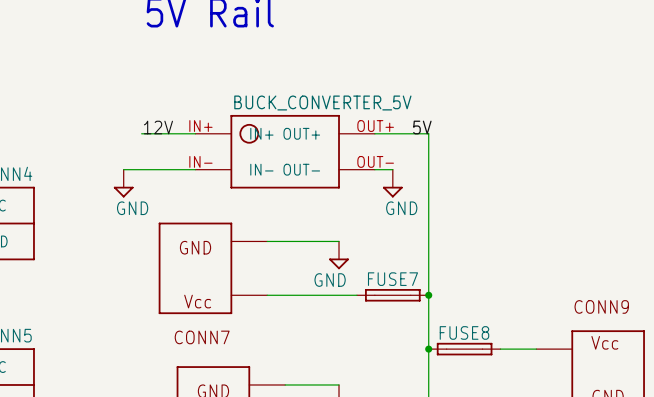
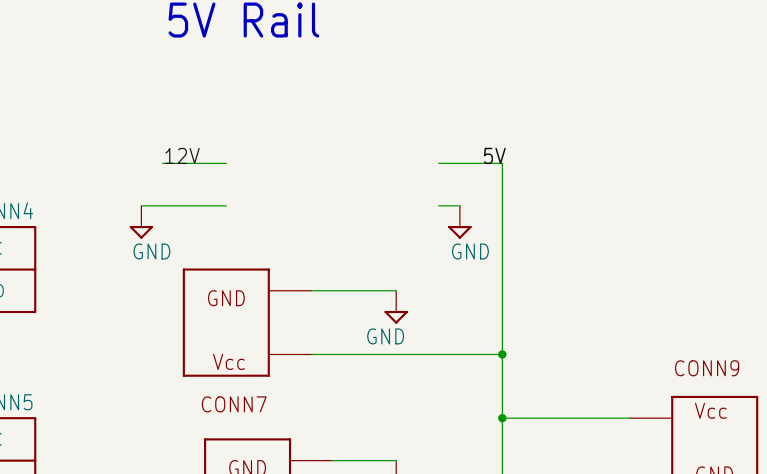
part: BUCK_CONVERTER_5V (285, 151) -> none
FUSE7: (392, 295) -> none
FUSE8: (464, 349) -> none

